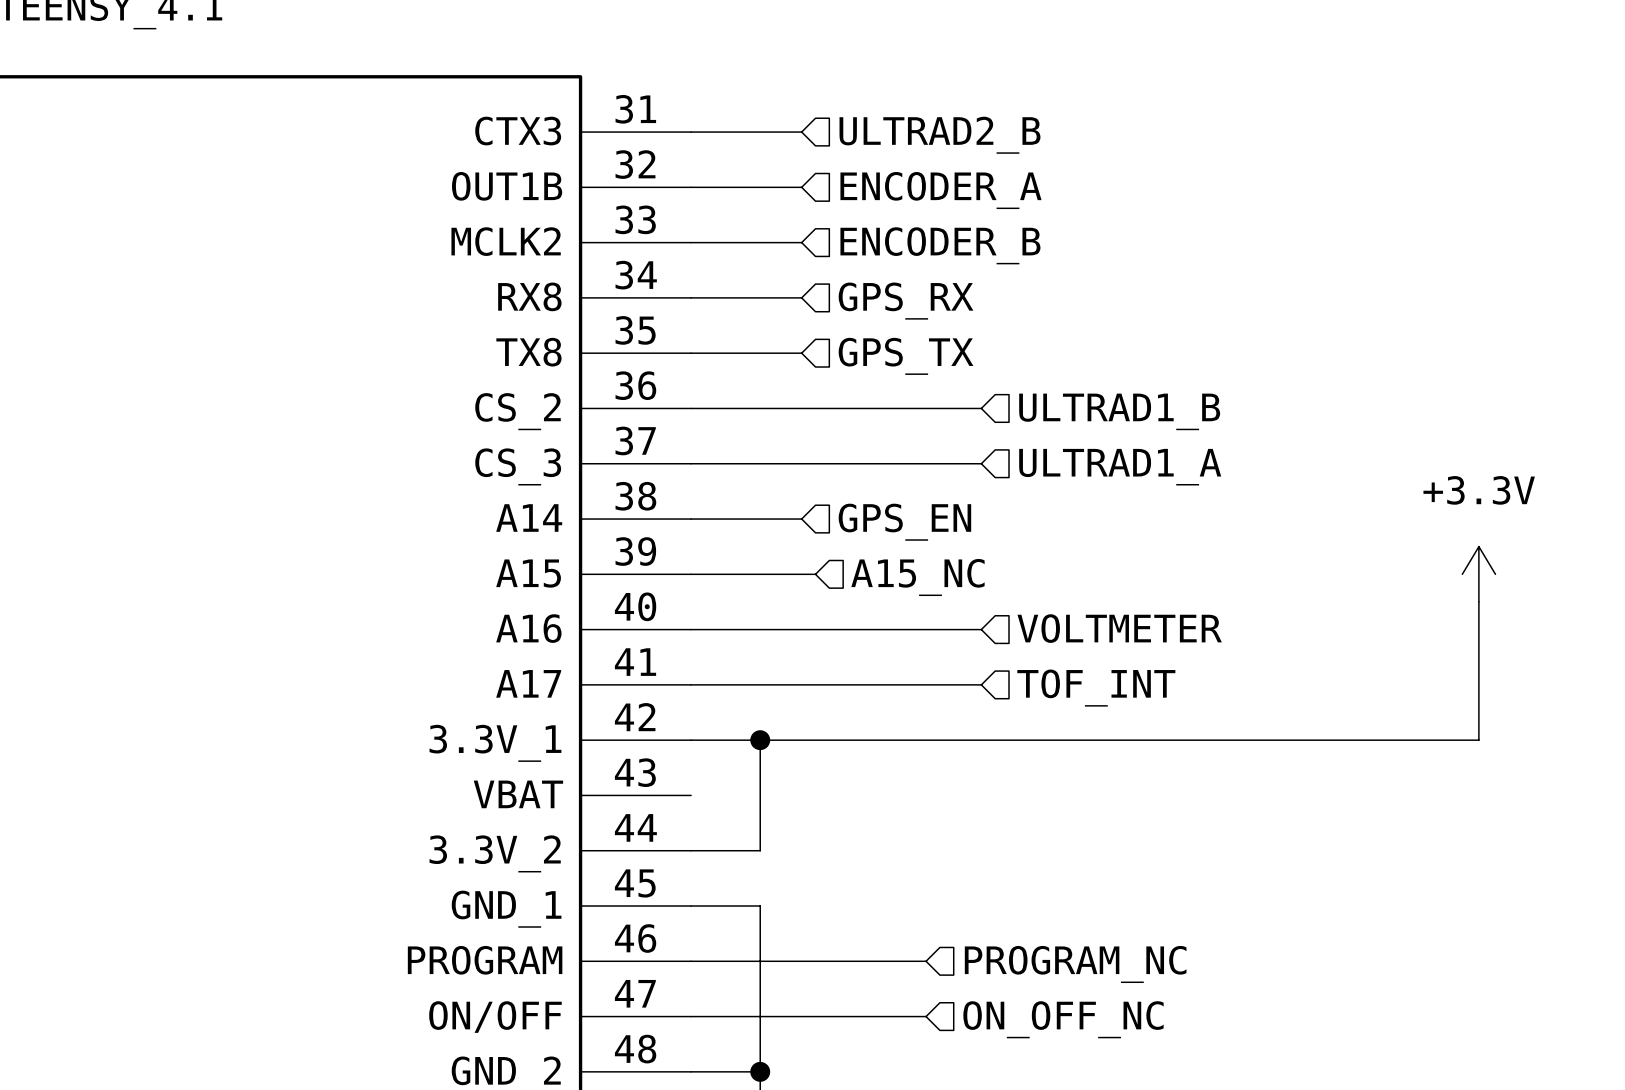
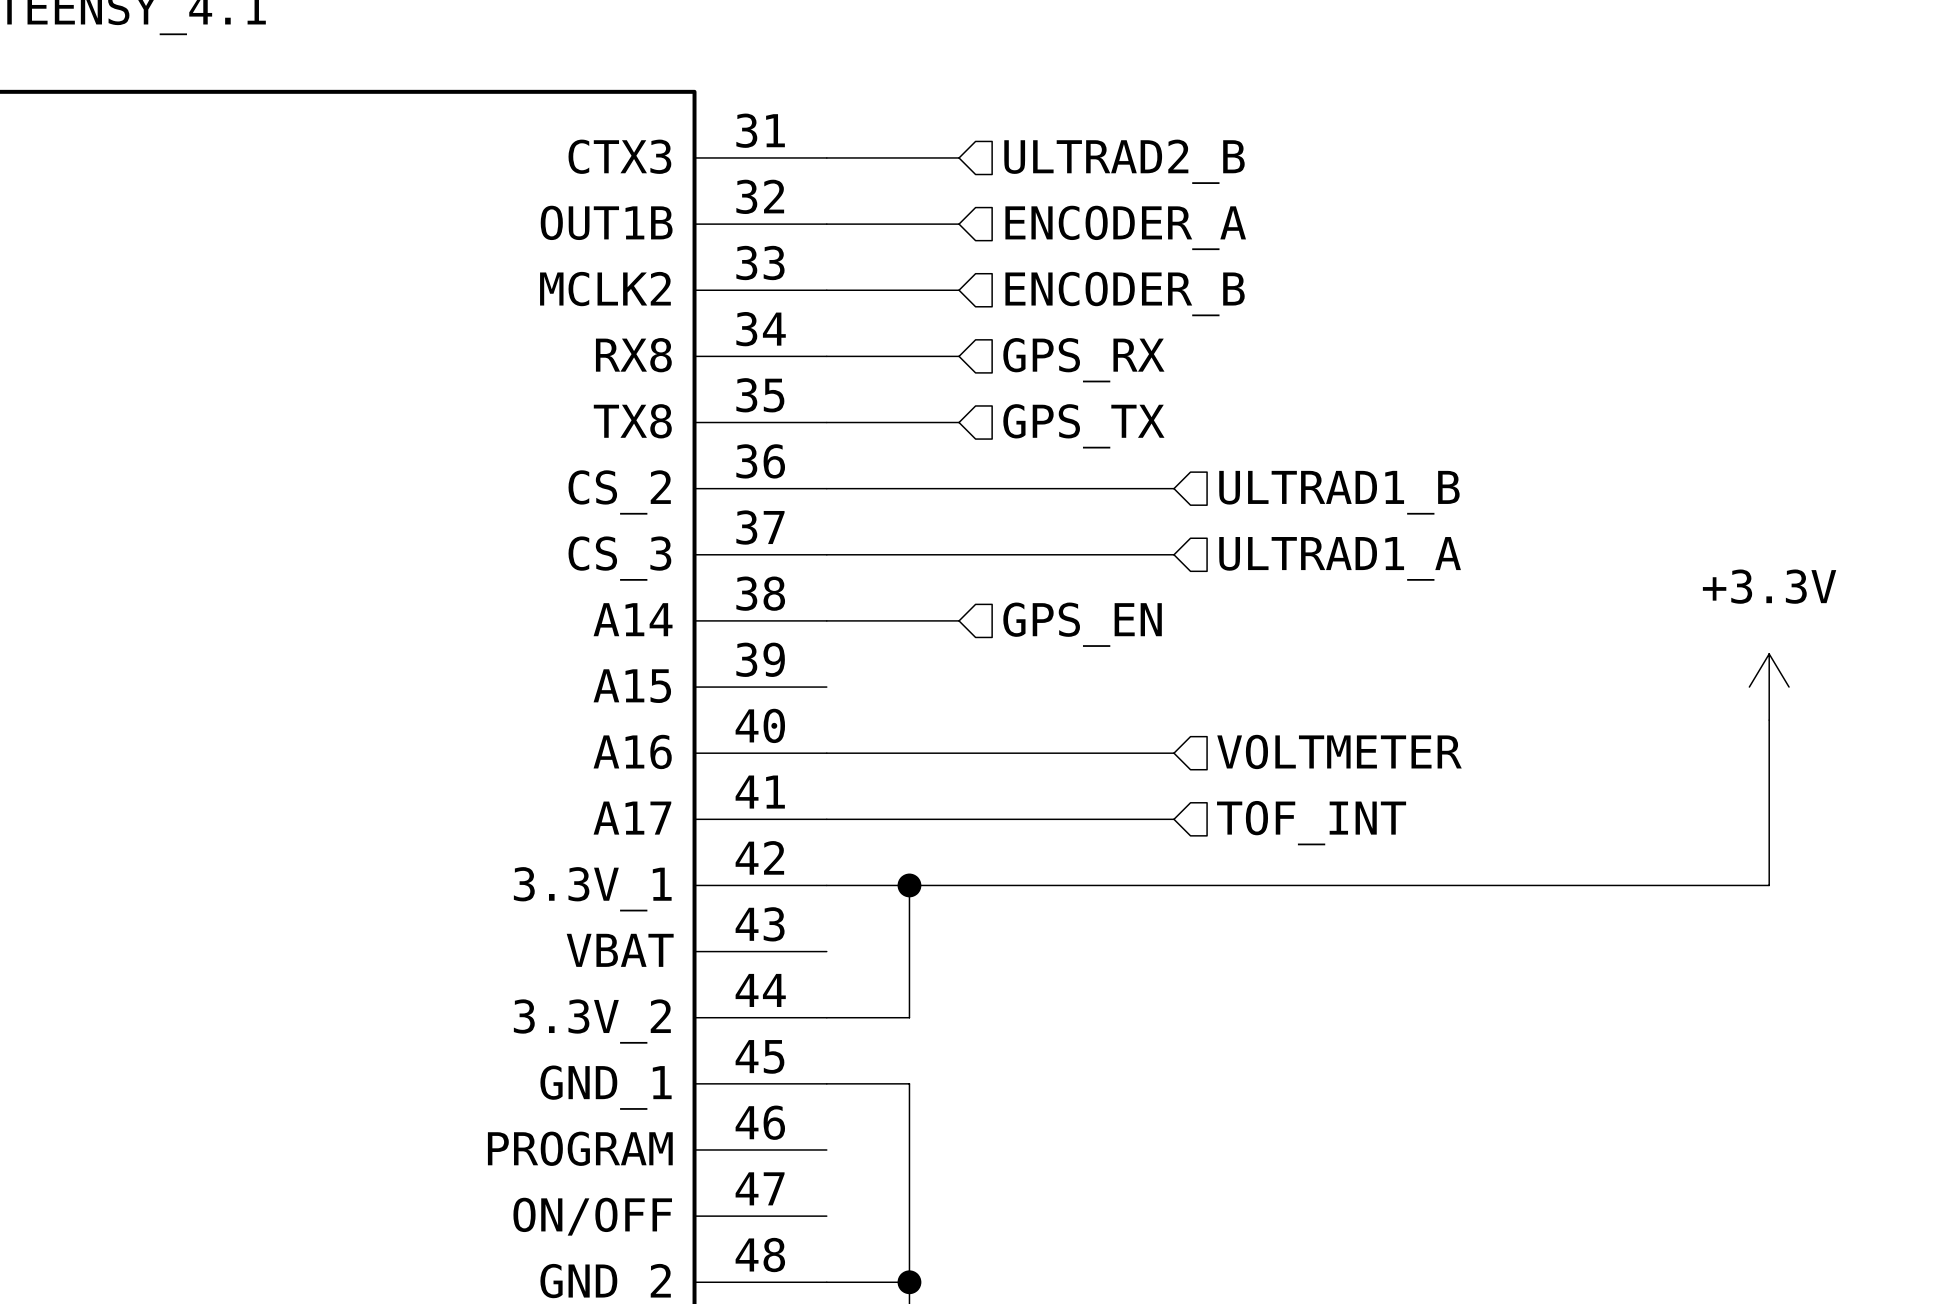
wire: (691, 574) (815, 574) -> none
hierarchical label: A15_NC (917, 577) -> none
wire: (691, 961) (926, 961) -> none
hierarchical label: PROGRAM_NC (1075, 964) -> none
wire: (691, 1016) (926, 1016) -> none
hierarchical label: ON_OFF_NC (1063, 1019) -> none

